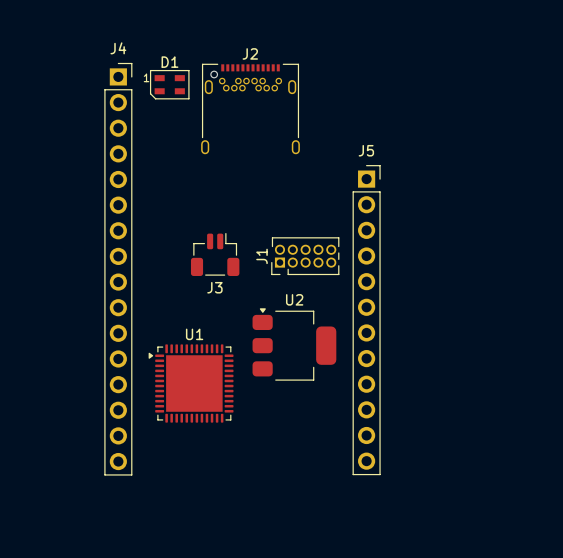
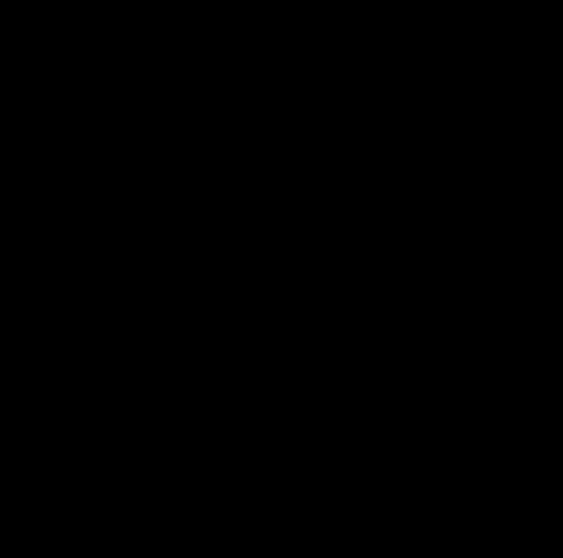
D1: (169, 84) -> none
J2: (250, 108) -> none
J3: (215, 254) -> none
J1: (305, 256) -> none
J4: (118, 269) -> none
J5: (366, 320) -> none
U2: (294, 344) -> none
U1: (191, 383) -> none

